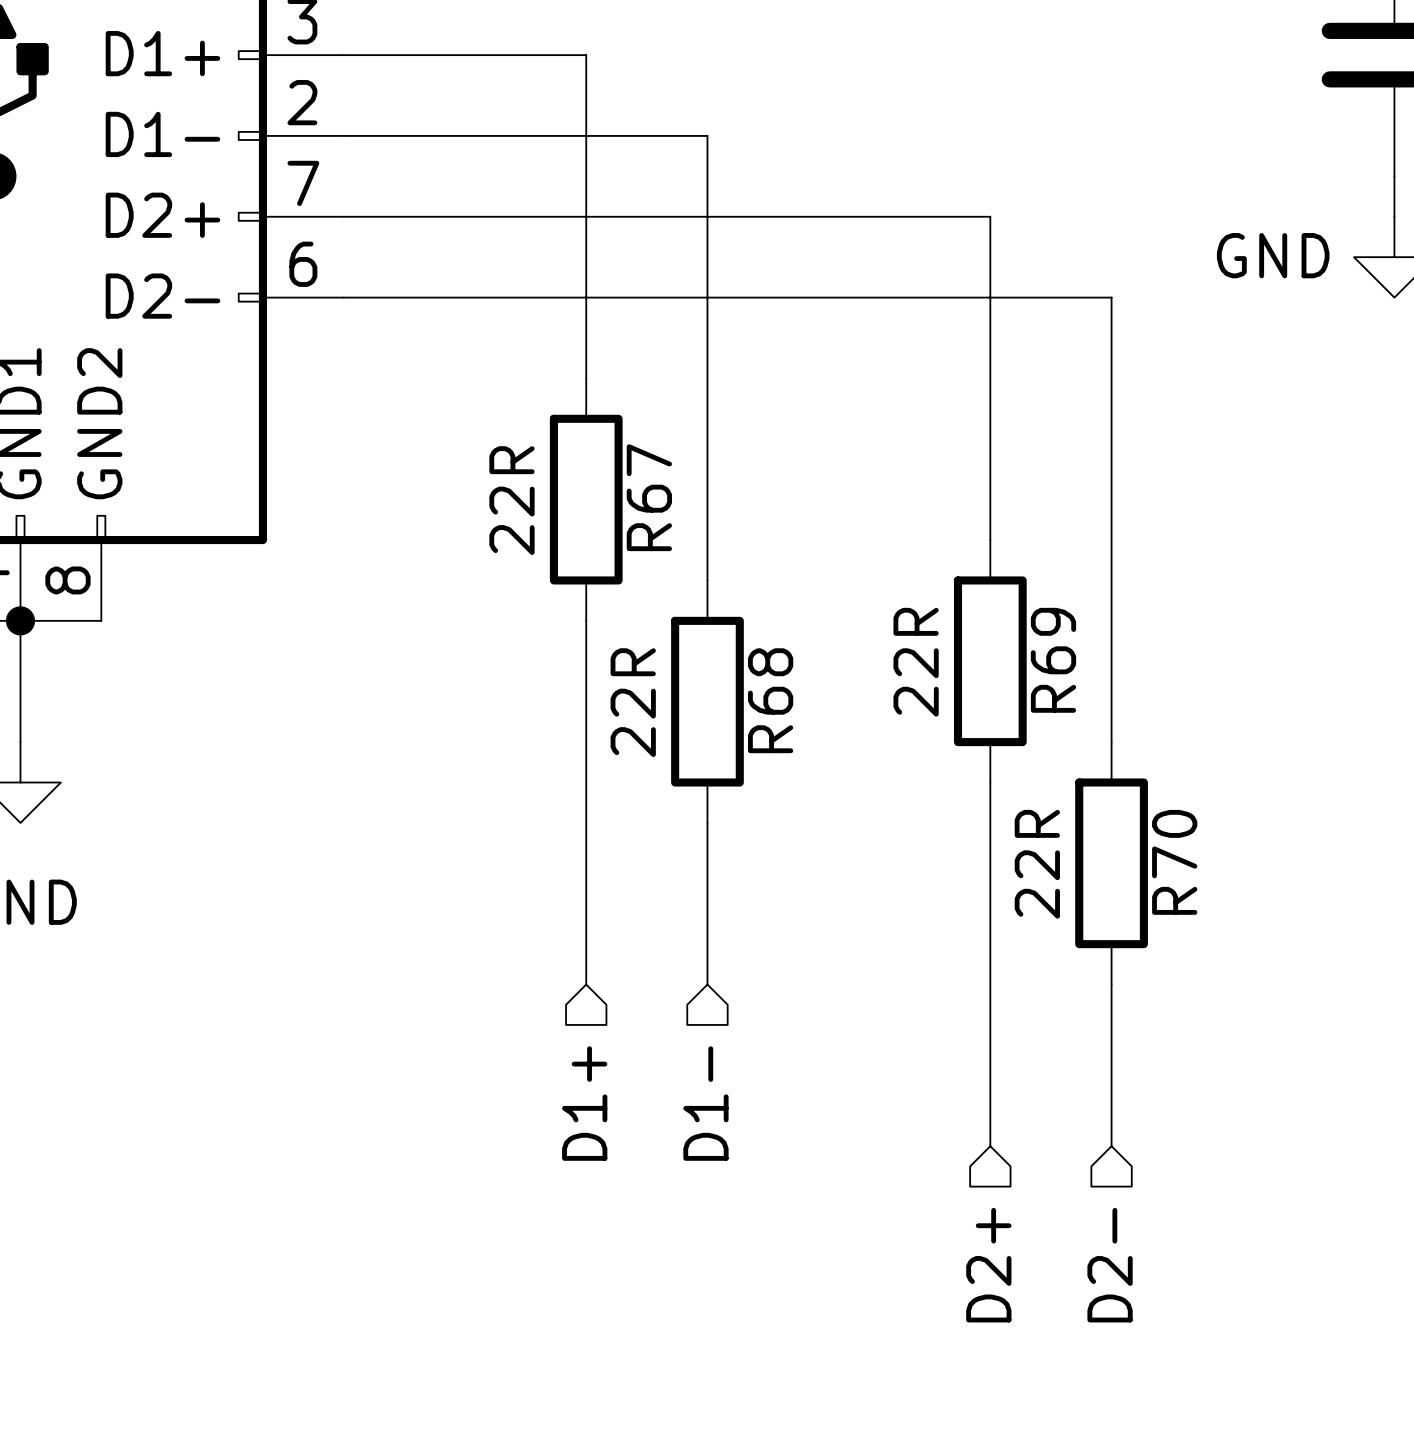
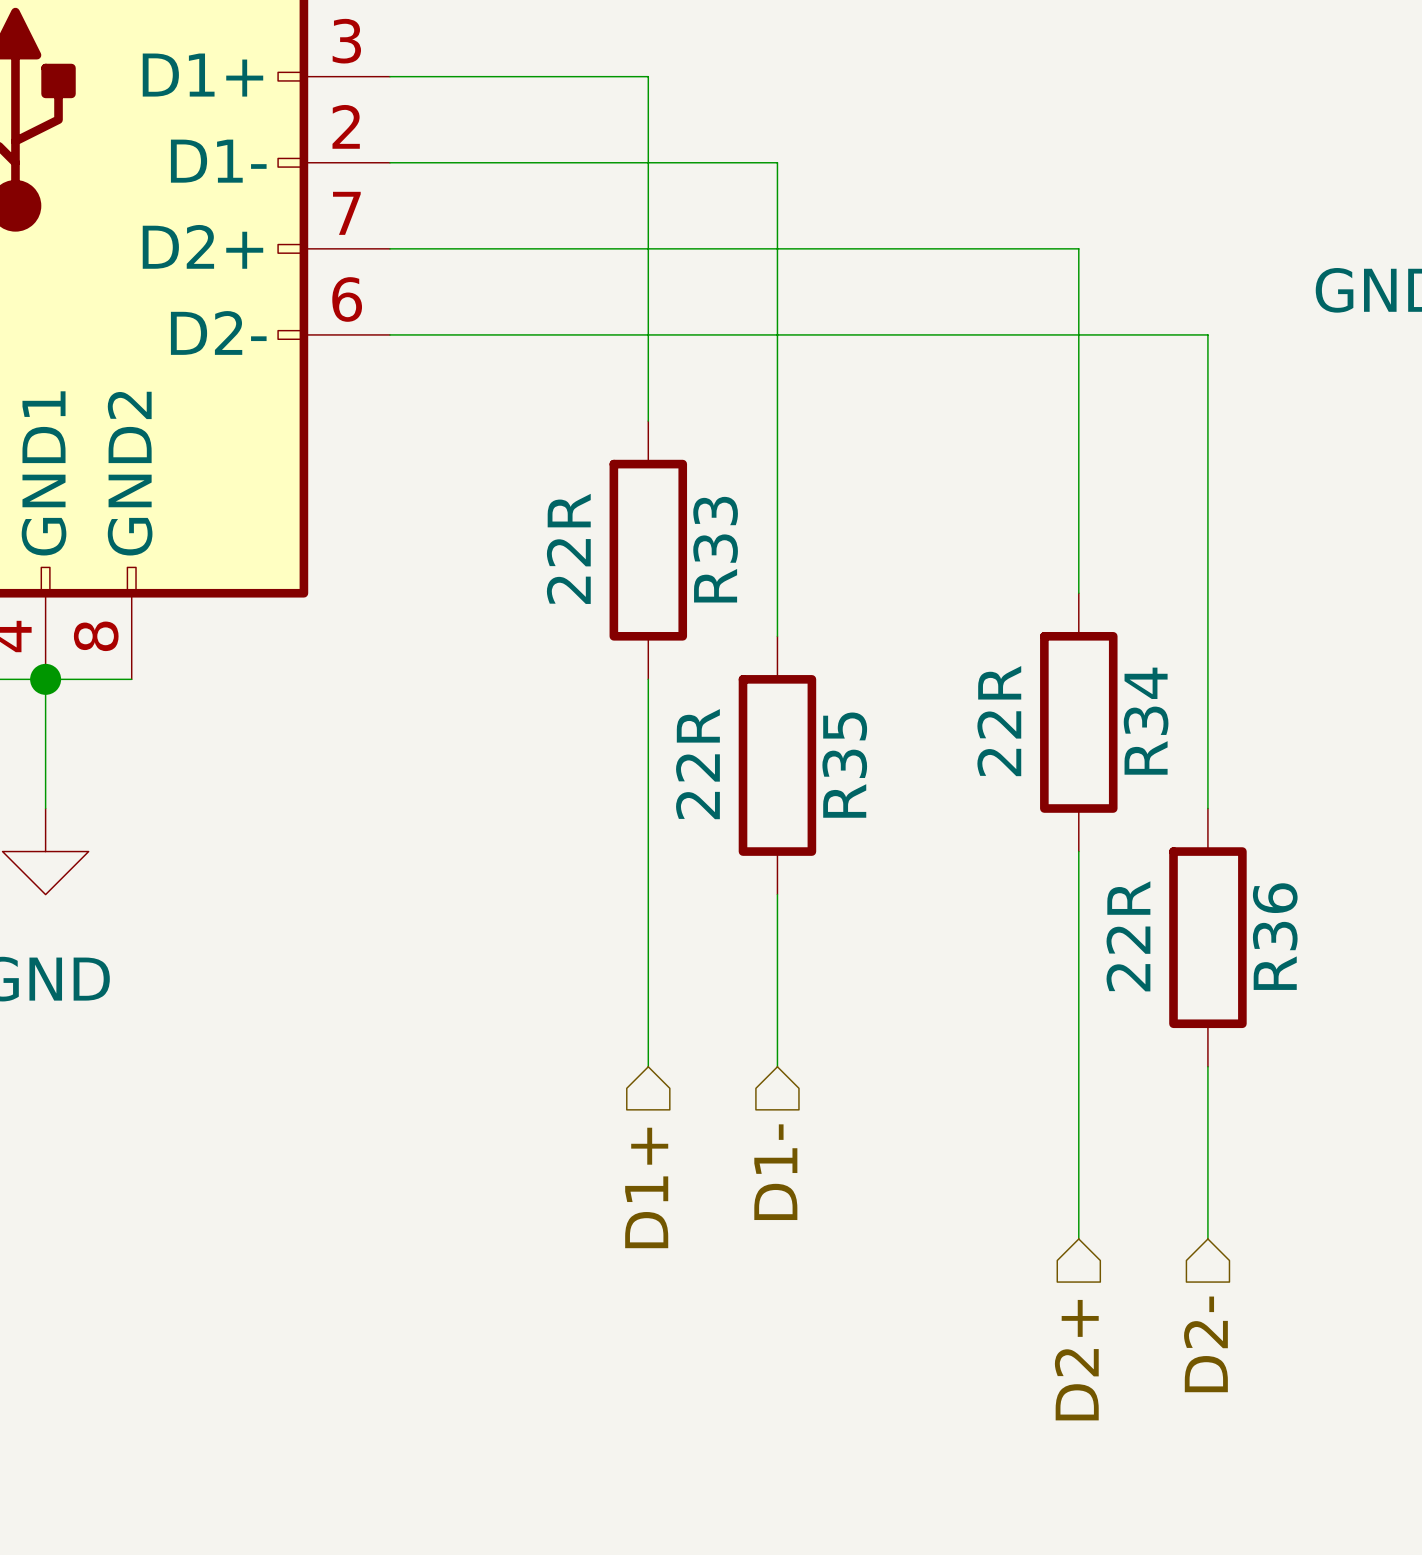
R67 name: R67 (649, 497) -> R33 (715, 549)
R69 name: R69 (1053, 660) -> R34 (1146, 721)
R68 name: R68 (770, 700) -> R35 (844, 765)
R70 name: R70 (1174, 862) -> R36 (1275, 936)

